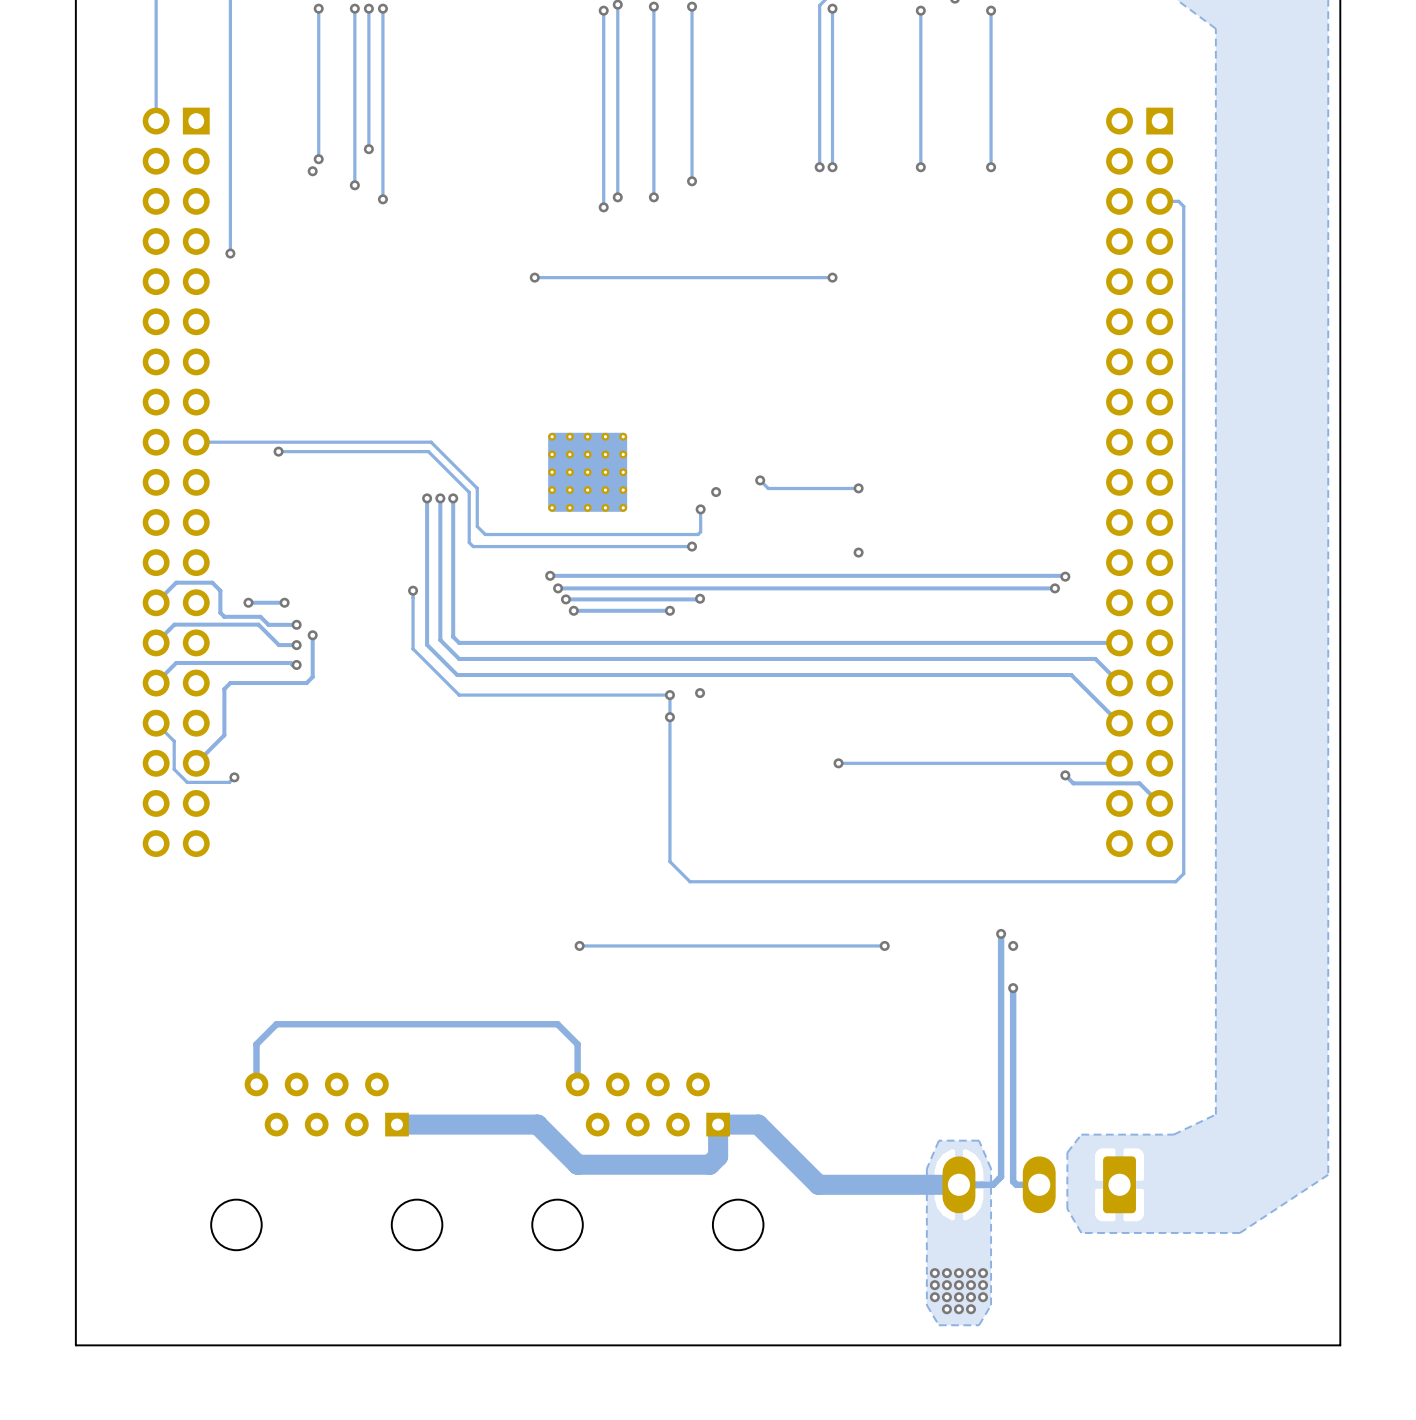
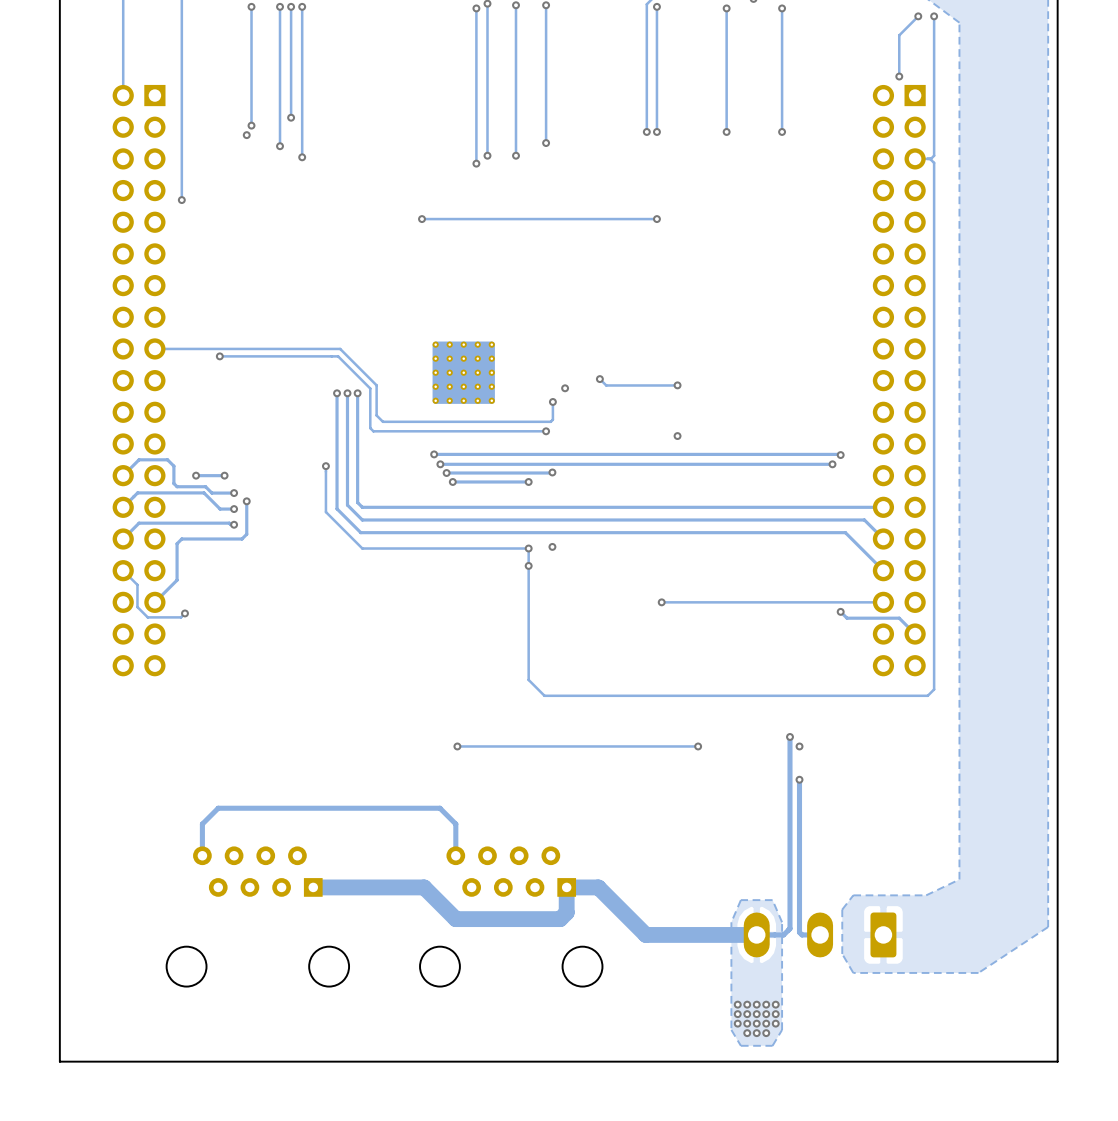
track: none -> (918, 16) (899, 35) (899, 76)
via: none -> (918, 16)
track: none -> (934, 16) (934, 155) (930, 158)
via: none -> (934, 16)
via: none -> (899, 76)

